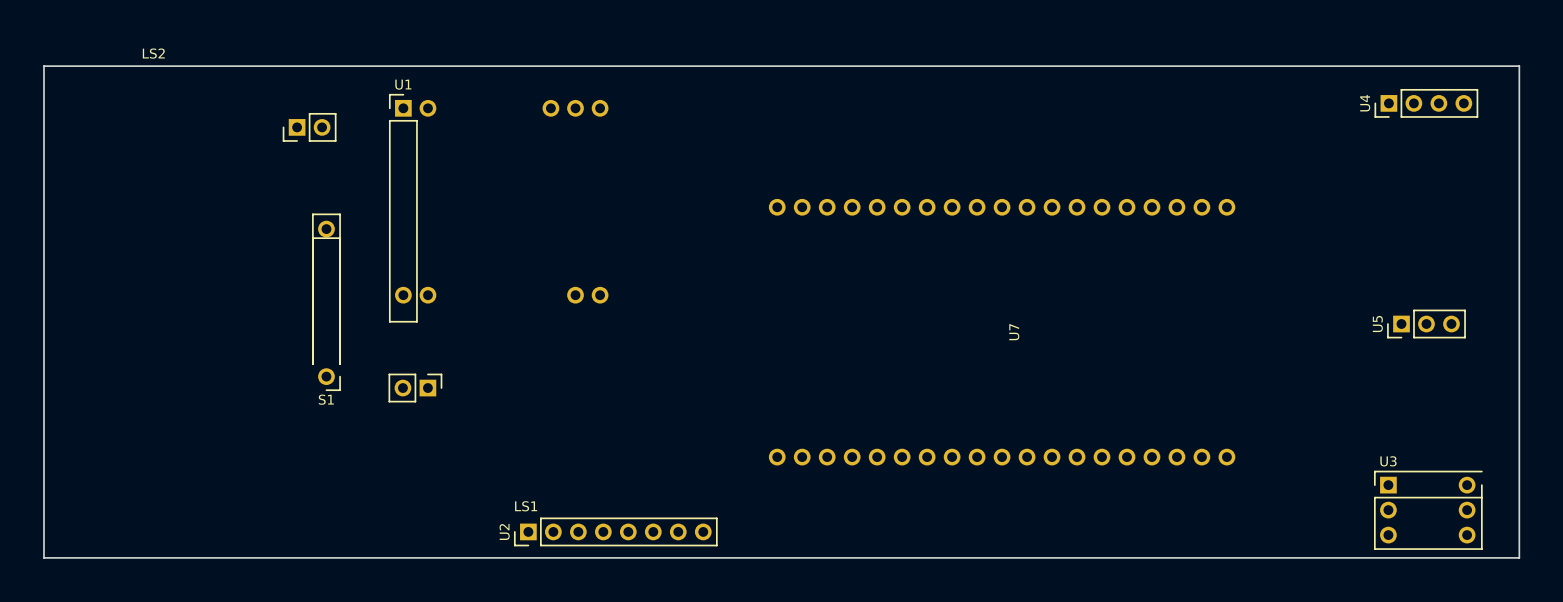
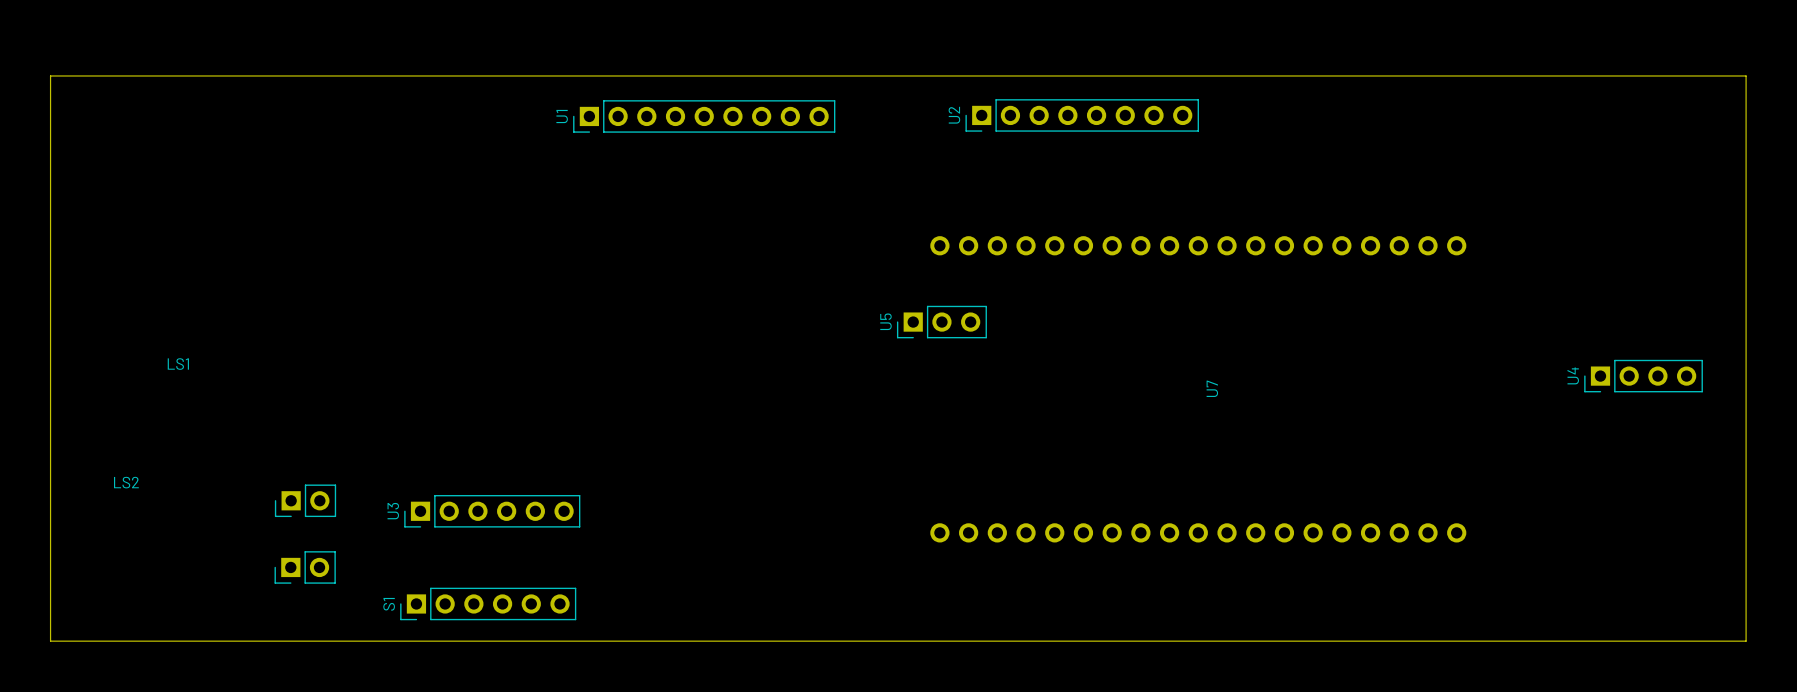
U1 name position: U1 (403, 84) -> U1 (562, 116)
U1 footprint: [389, 94, 609, 323] -> [573, 100, 836, 133]
U4 position: (1426, 103) -> (1643, 376)
LS2 position: (309, 127) -> (305, 567)
S1 footprint: [312, 213, 341, 391] -> [400, 587, 577, 621]
U5 position: (1426, 324) -> (941, 322)
U7 position: (1002, 332) -> (1198, 389)
LS1 rotation: 0° (415, 388) -> 180° (305, 500)
LS1 position: (415, 388) -> (305, 500)
S1 name position: S1 (326, 399) -> S1 (389, 604)
U3 name position: U3 (1388, 461) -> U3 (393, 511)
U3 footprint: [1374, 470, 1483, 550] -> [404, 495, 581, 528]
U2 position: (615, 531) -> (1082, 115)

